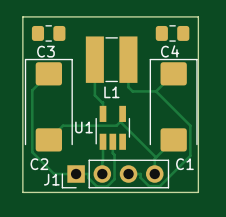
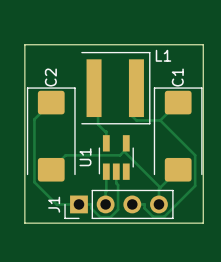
C3: (48, 33) -> none
C4: (172, 33) -> none
L1 footprint: [85, 36, 138, 83] -> [81, 51, 151, 125]
L1 name position: L1 (111, 92) -> L1 (163, 55)
U1 name rotation: 0° (84, 127) -> 90° counterclockwise (85, 157)
C2 name rotation: 0° (39, 164) -> 90° counterclockwise (50, 77)
C2 name position: C2 (39, 164) -> C2 (50, 77)
C1 name rotation: 0° (184, 164) -> 90° counterclockwise (177, 77)
C1 name position: C1 (184, 164) -> C1 (177, 77)
J1 name rotation: 0° (51, 179) -> 90° counterclockwise (54, 204)

